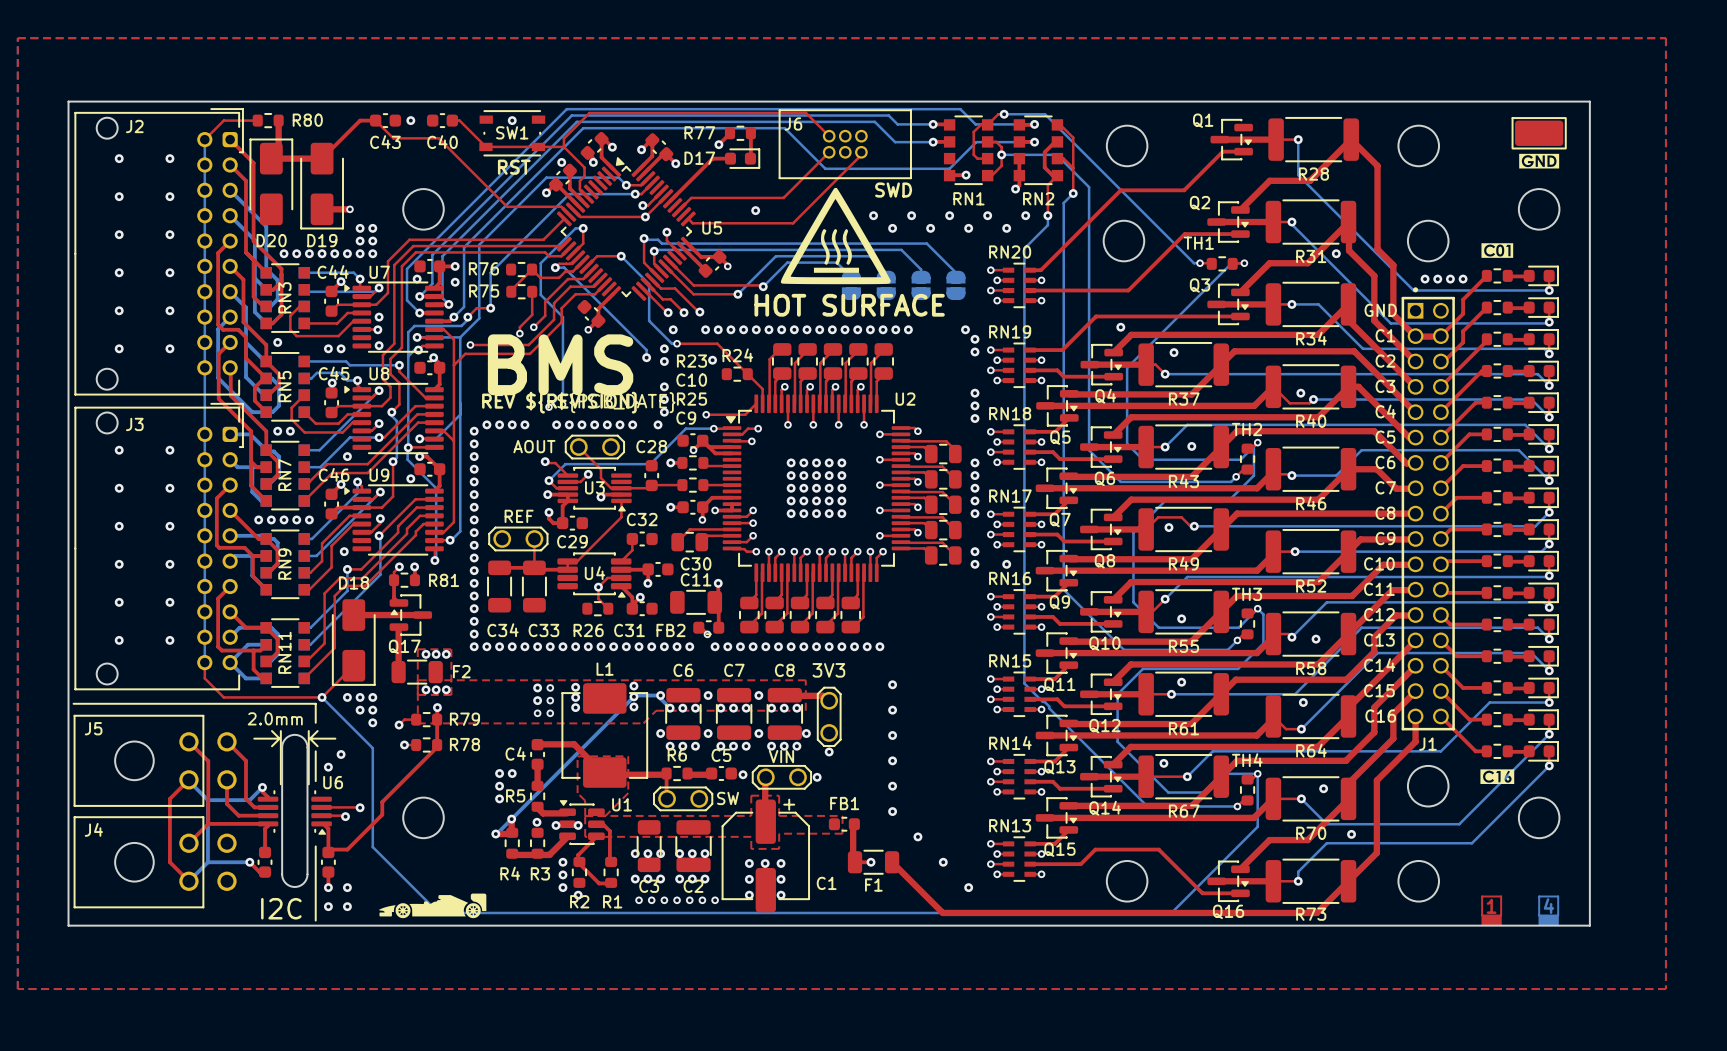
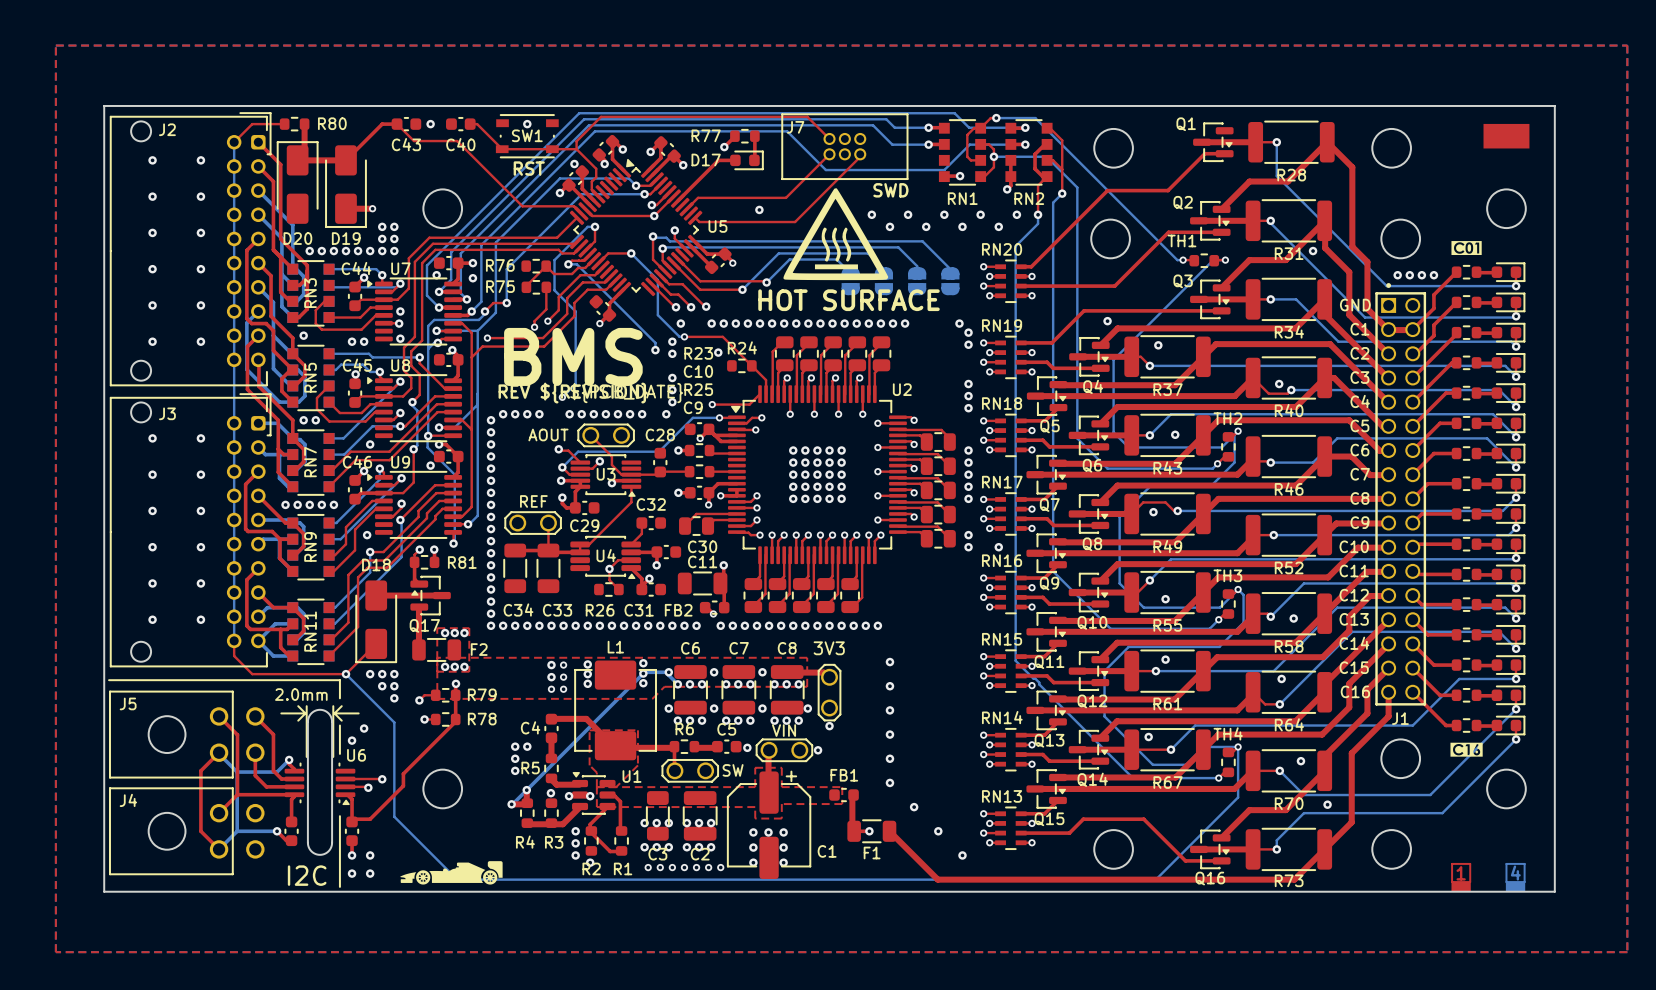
part footprint: [1511, 117, 1567, 150] -> [1483, 123, 1530, 149]
J6 name: J6 (793, 123) -> J7 (795, 127)
drawing: [1519, 153, 1560, 169] -> none

